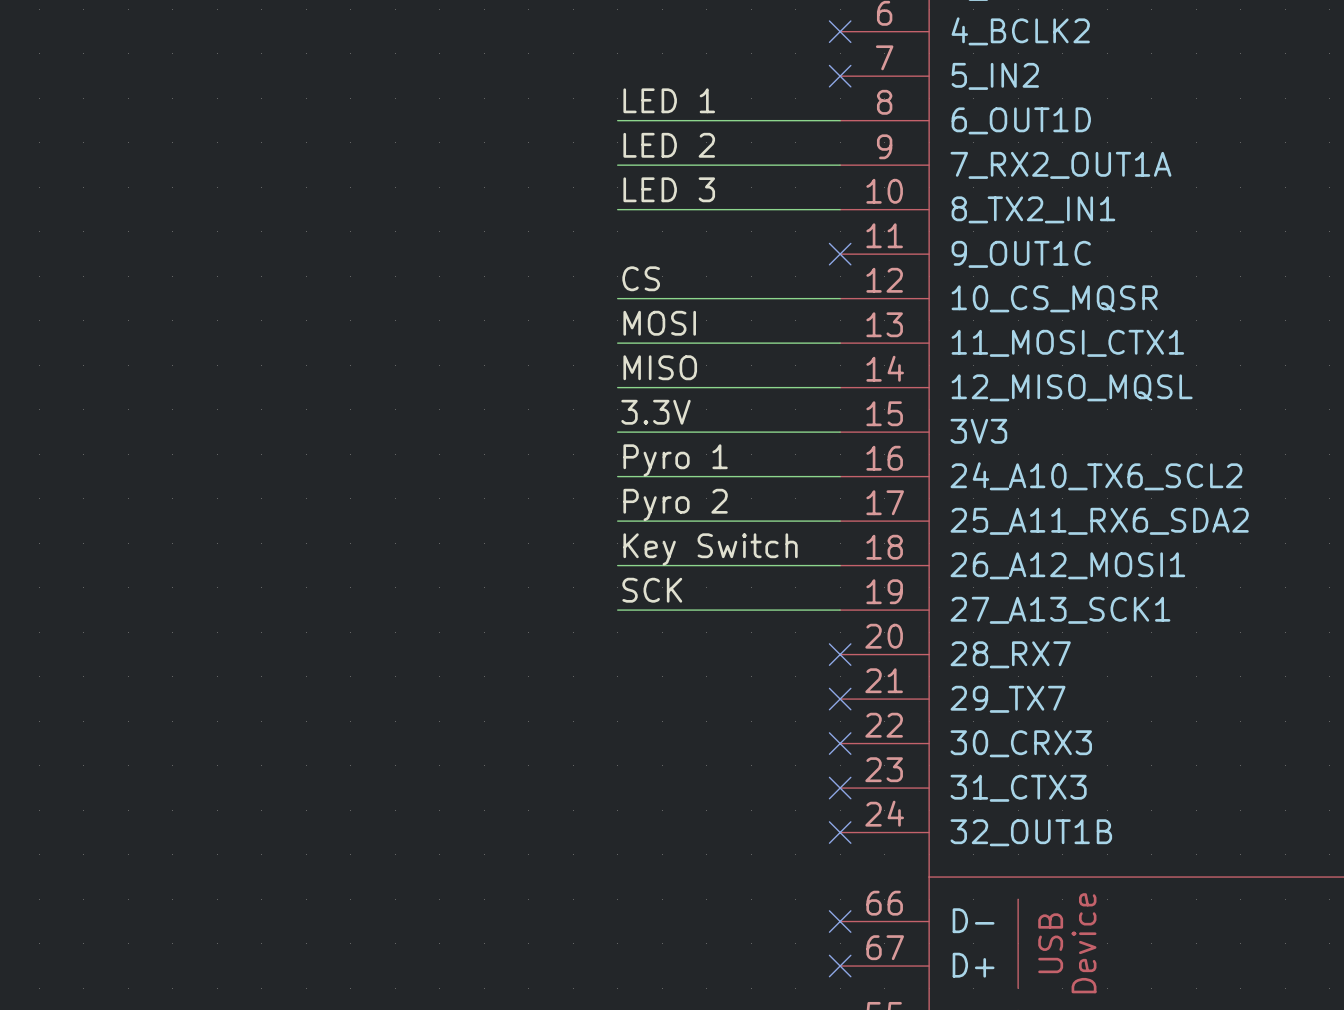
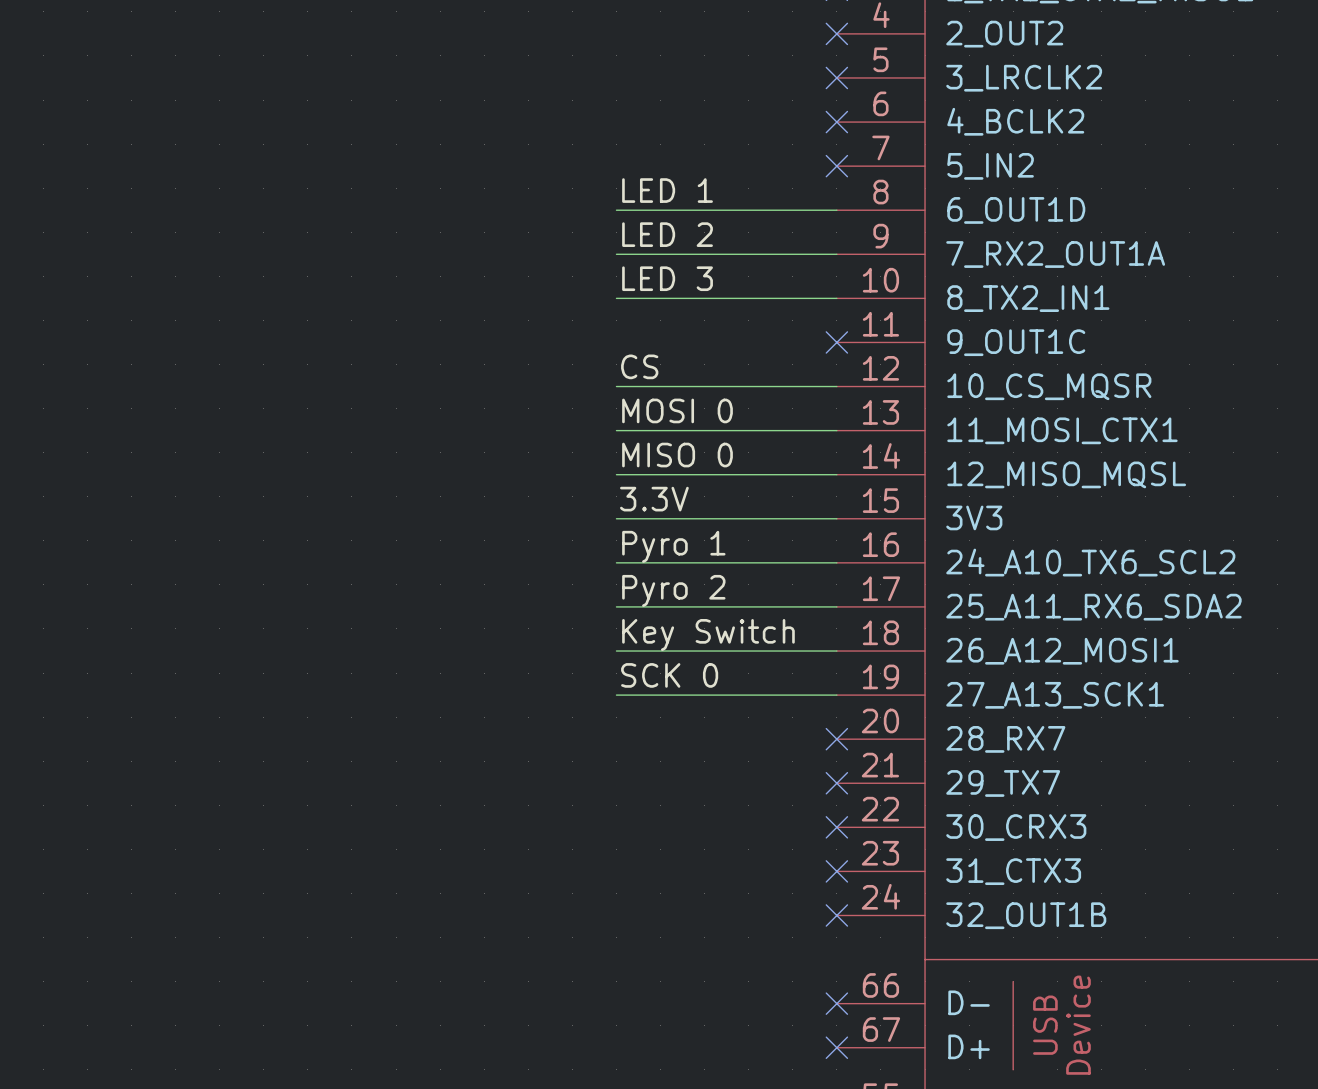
label: MOSI (659, 323) -> MOSI 0 (677, 410)
label: MISO (660, 367) -> MISO 0 (677, 455)
label: SCK (652, 590) -> SCK 0 (669, 675)

